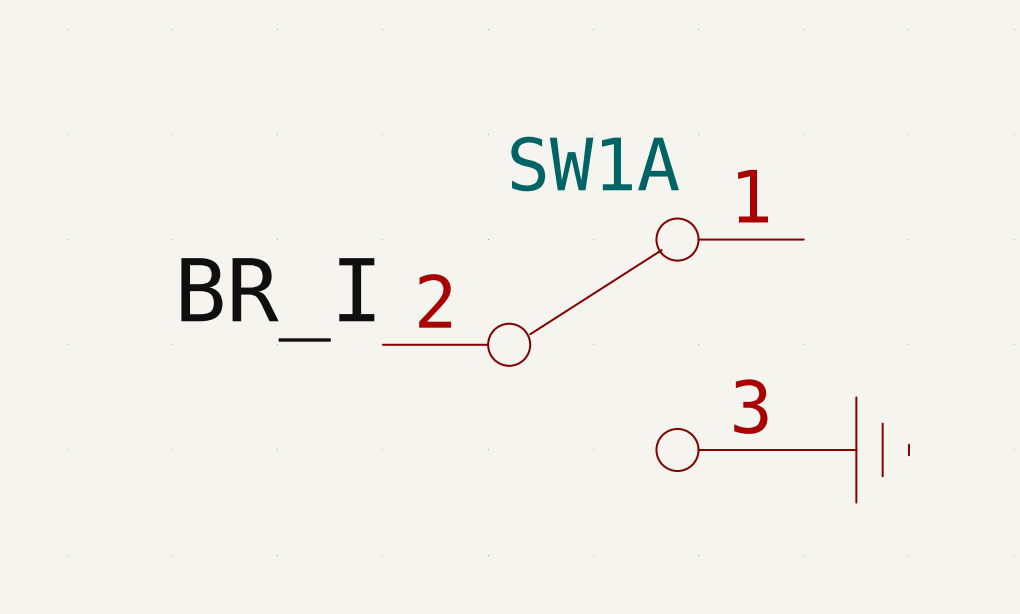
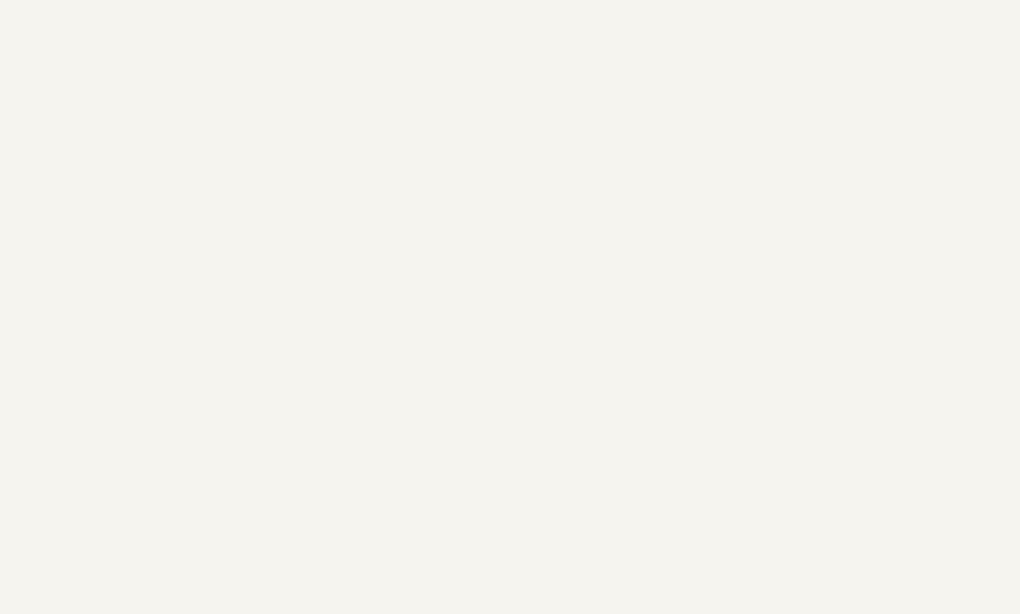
label: BR_I (277, 299) -> none
SW1A: (593, 344) -> none
power symbol: (856, 449) -> none

